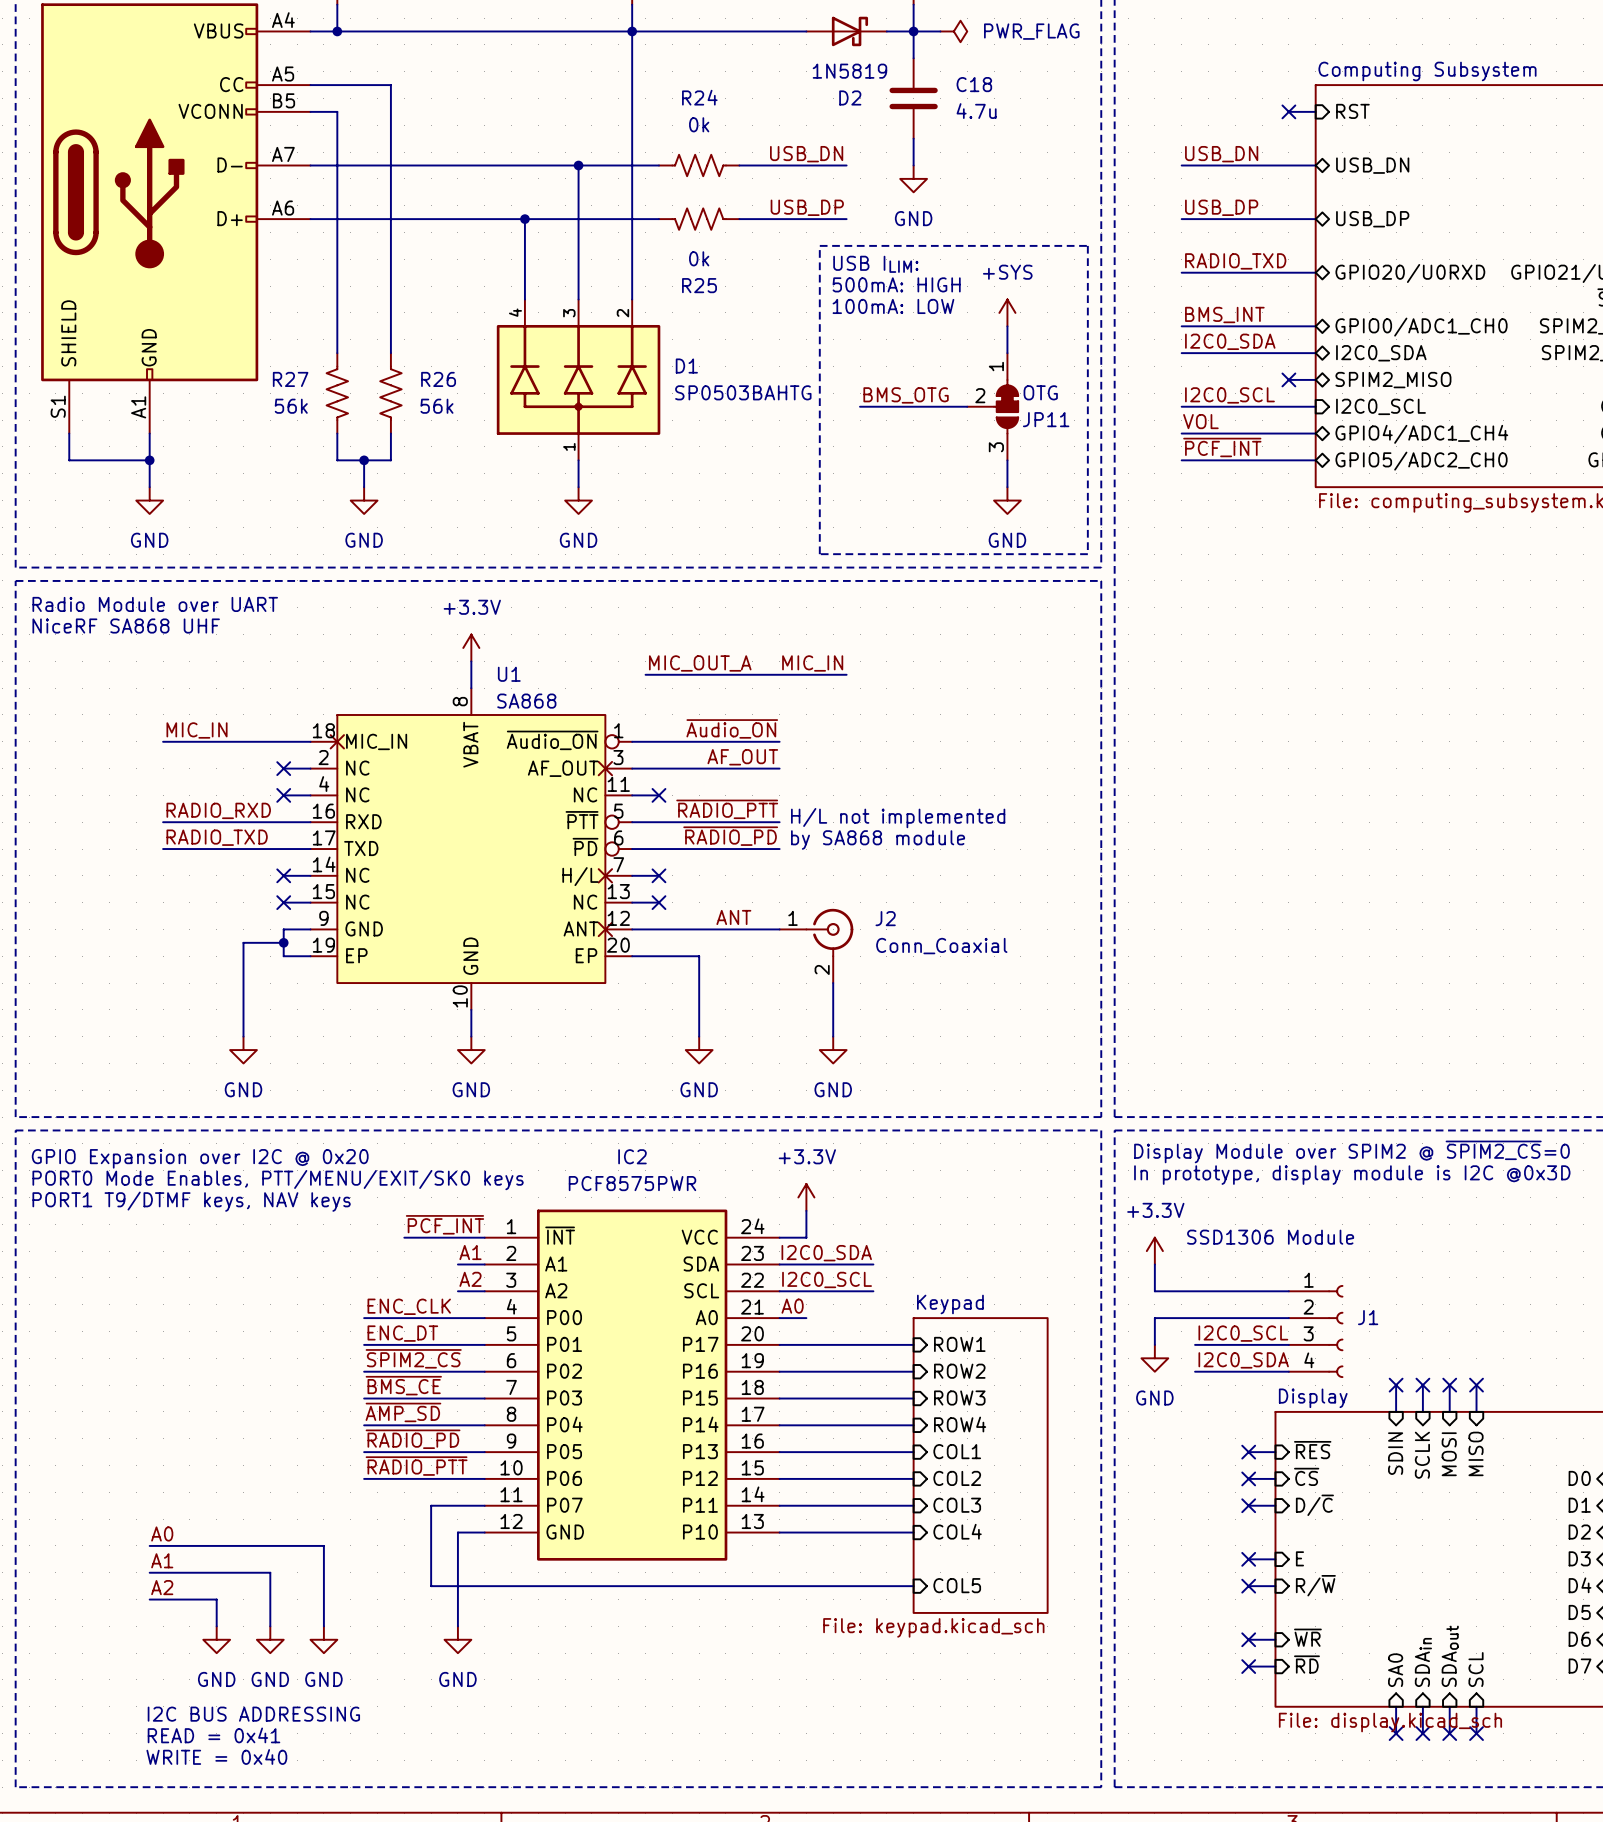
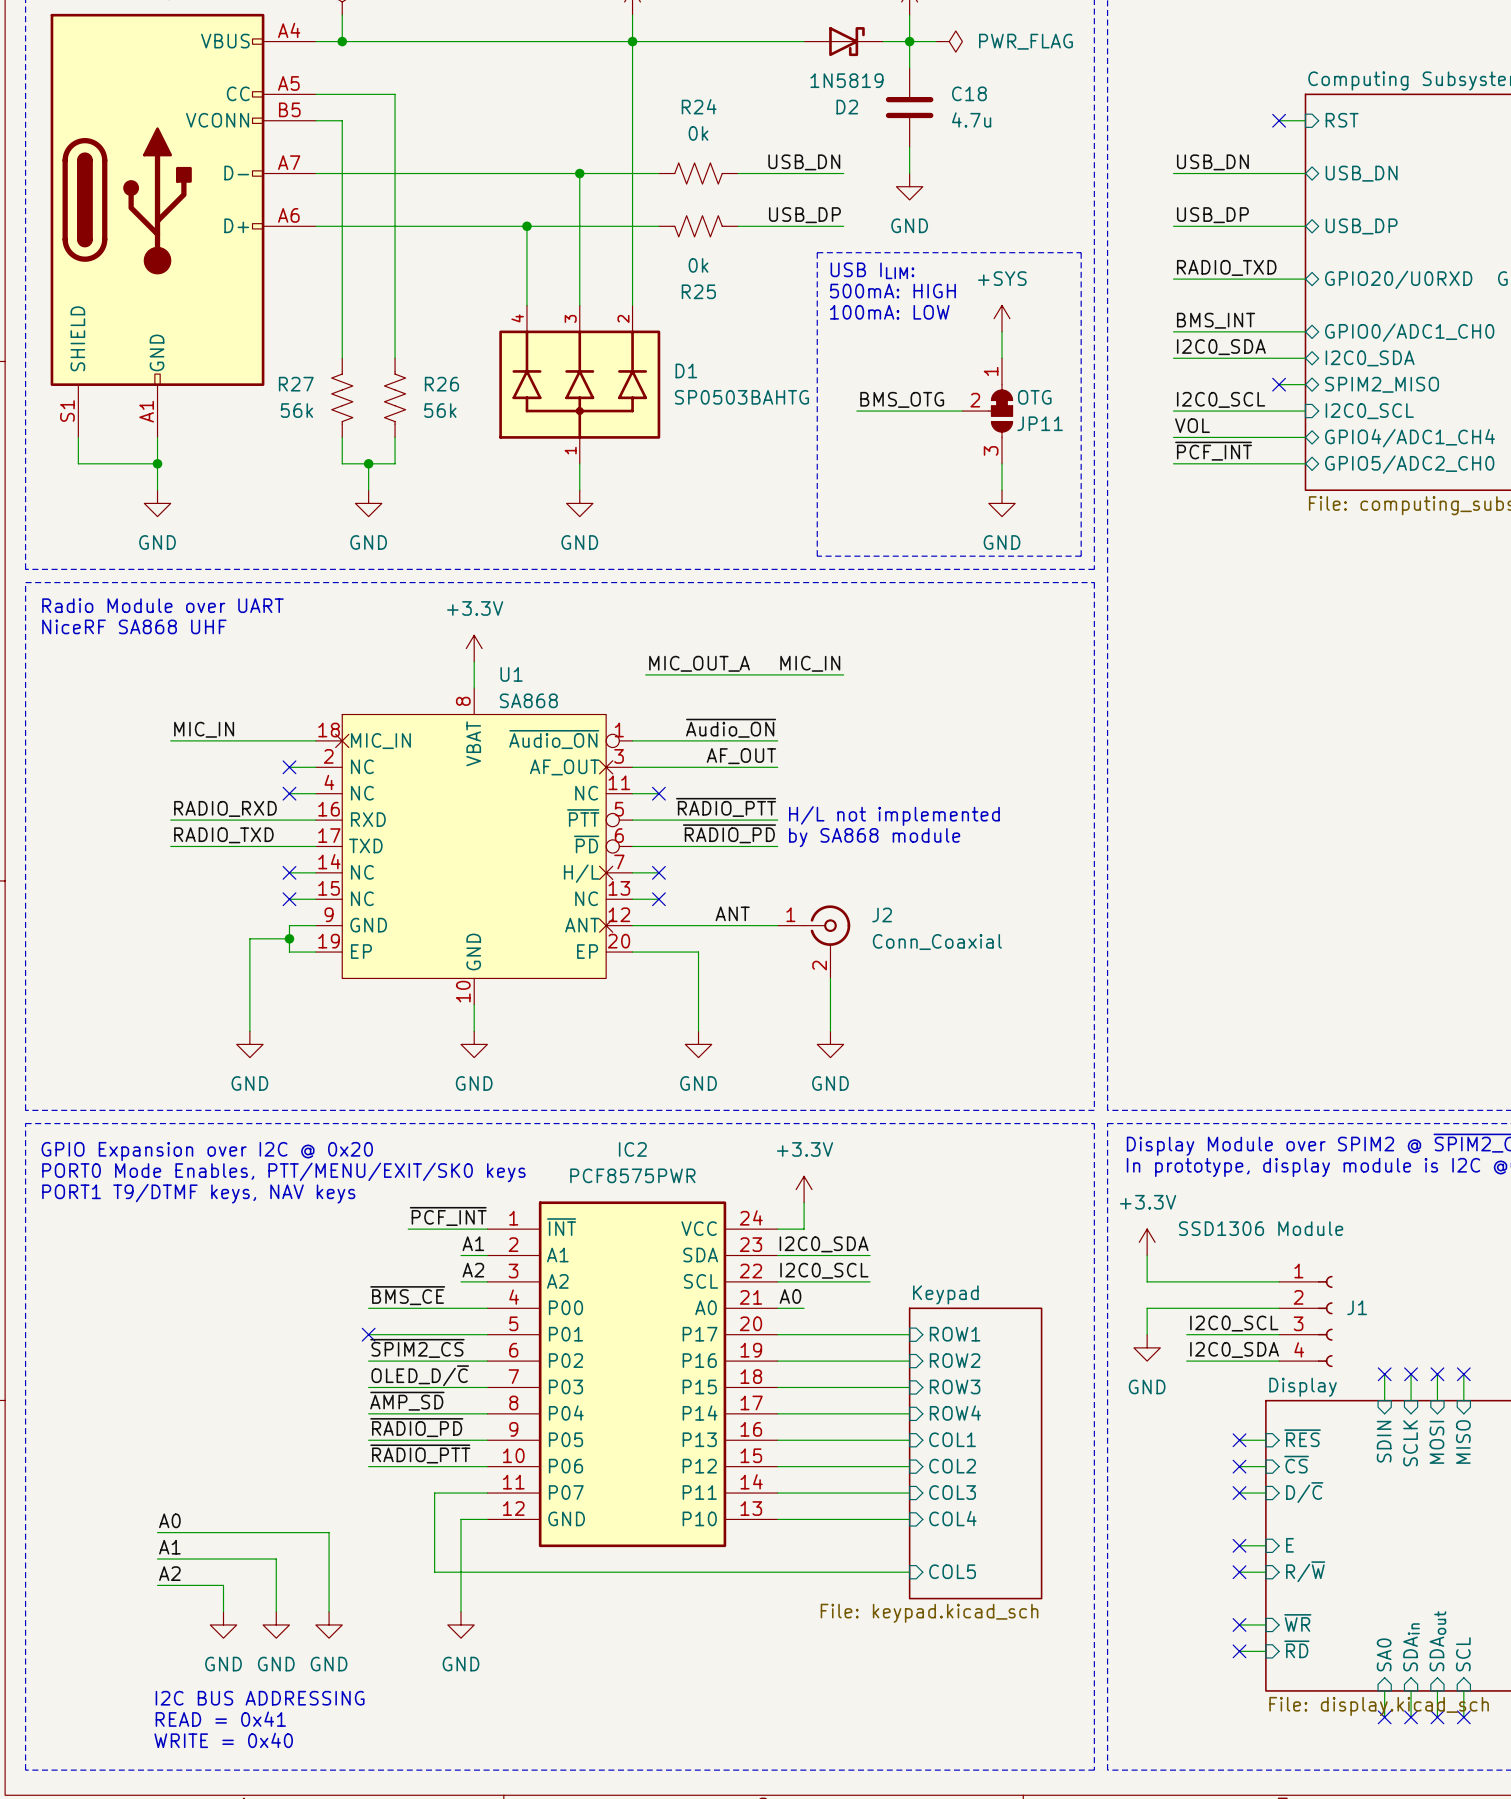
label: ENC_CLK (409, 1306) -> ~{BMS_CE} (407, 1295)
label: ENC_DT (402, 1333) -> none
no-connect mark: none -> (368, 1334)
label: ~{BMS_CE} (403, 1385) -> OLED_D/~{C} (420, 1375)

